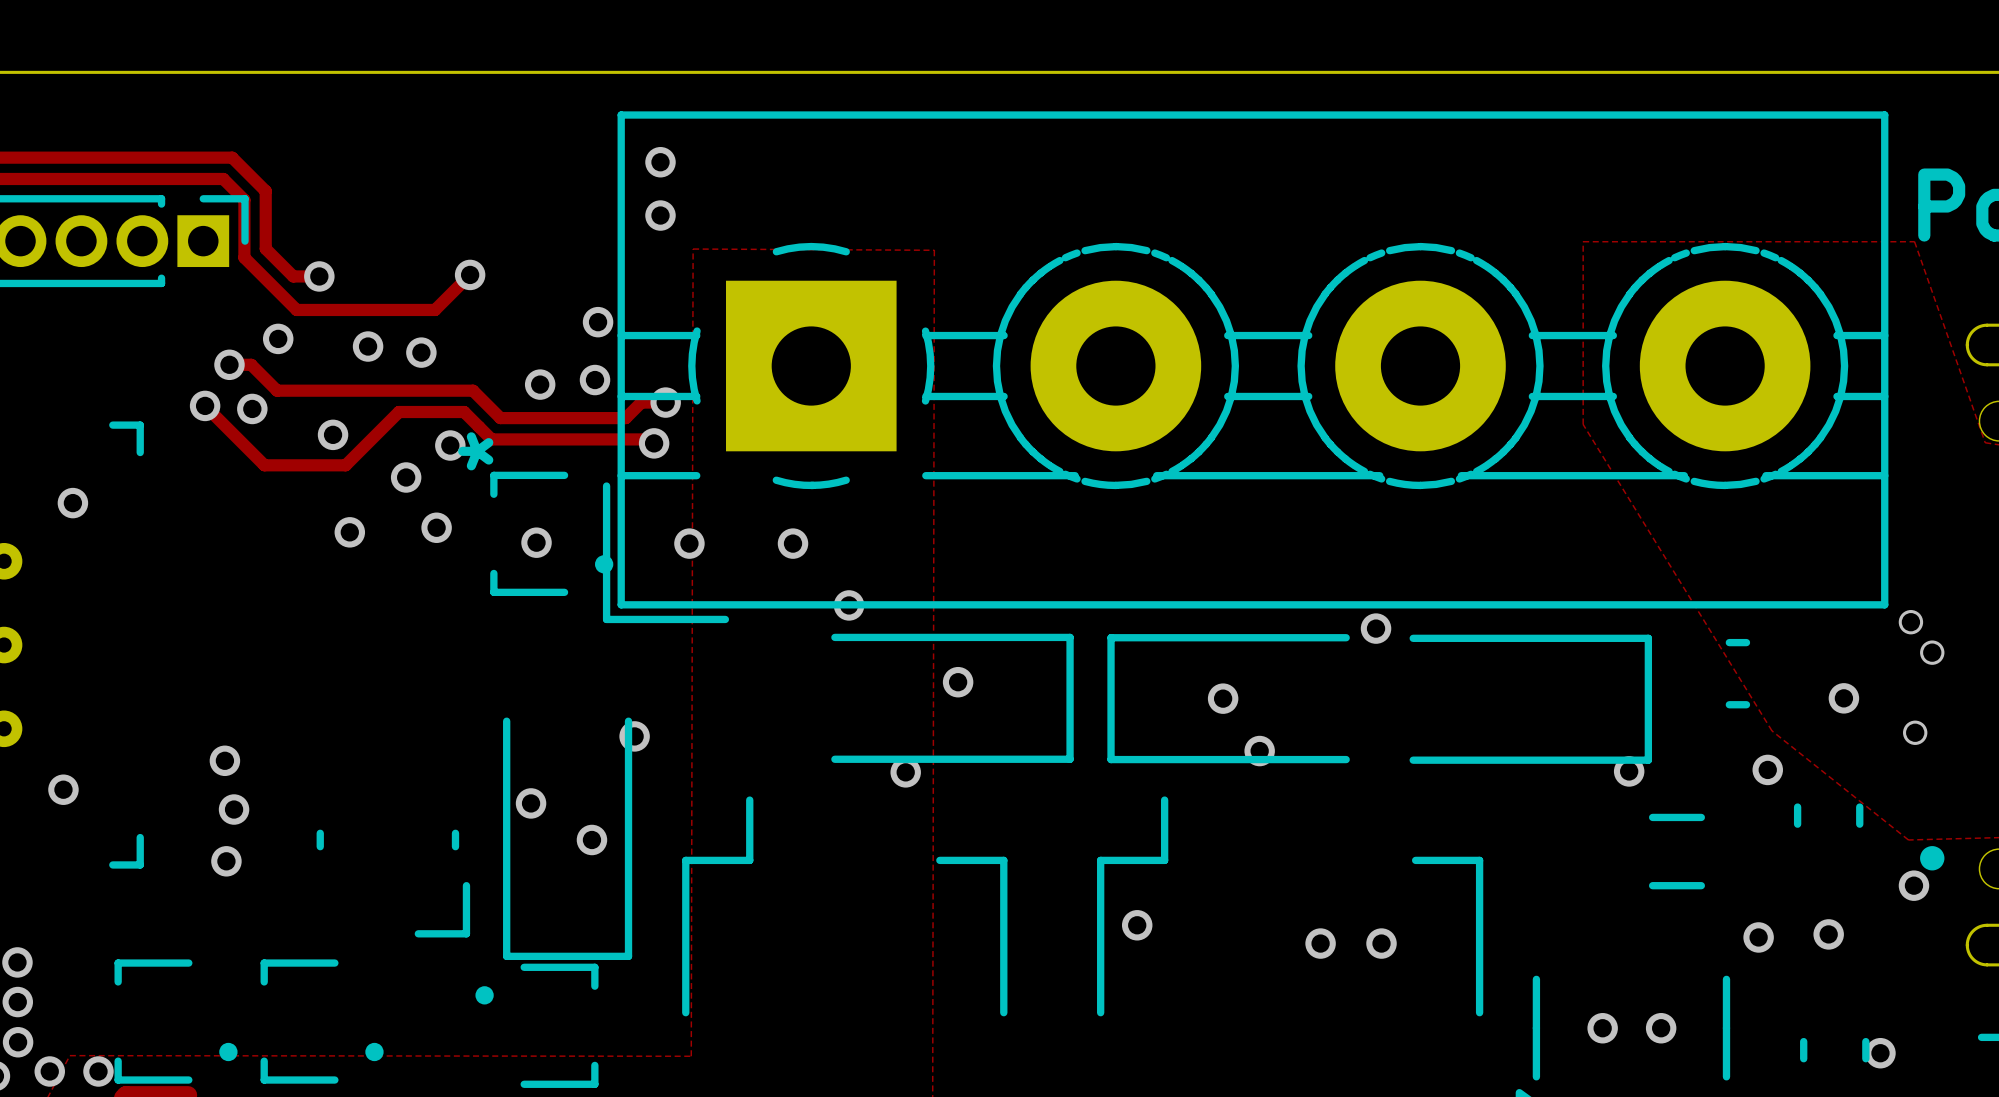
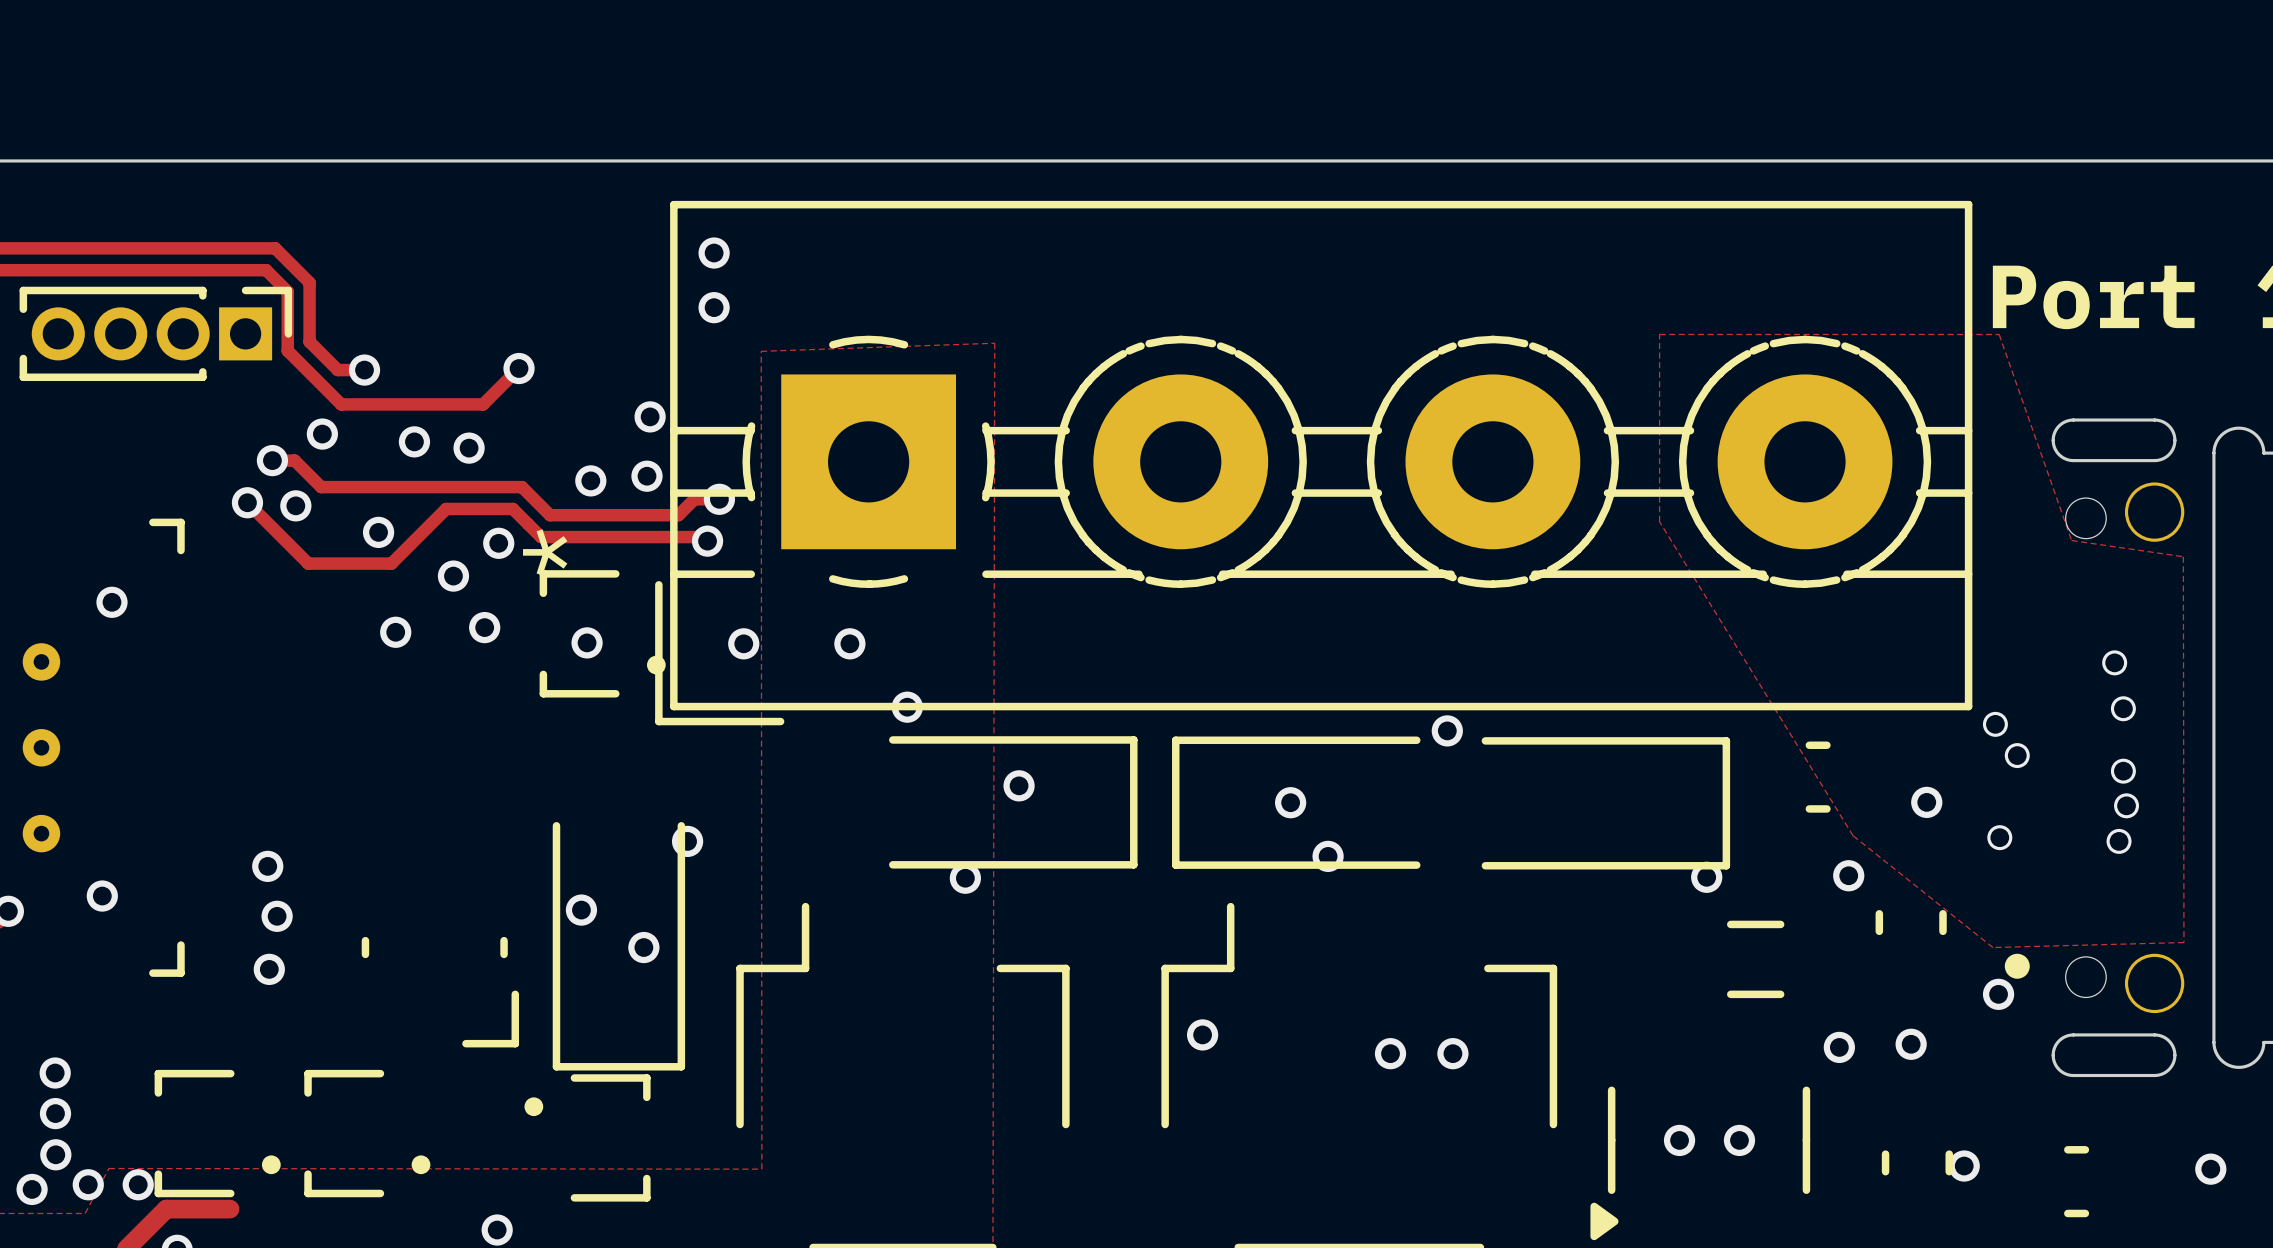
zone outline: (934, 250) (693, 249) (691, 1056) (69, 1055) -> (994, 343) (761, 351) (761, 1169) (108, 1168)

